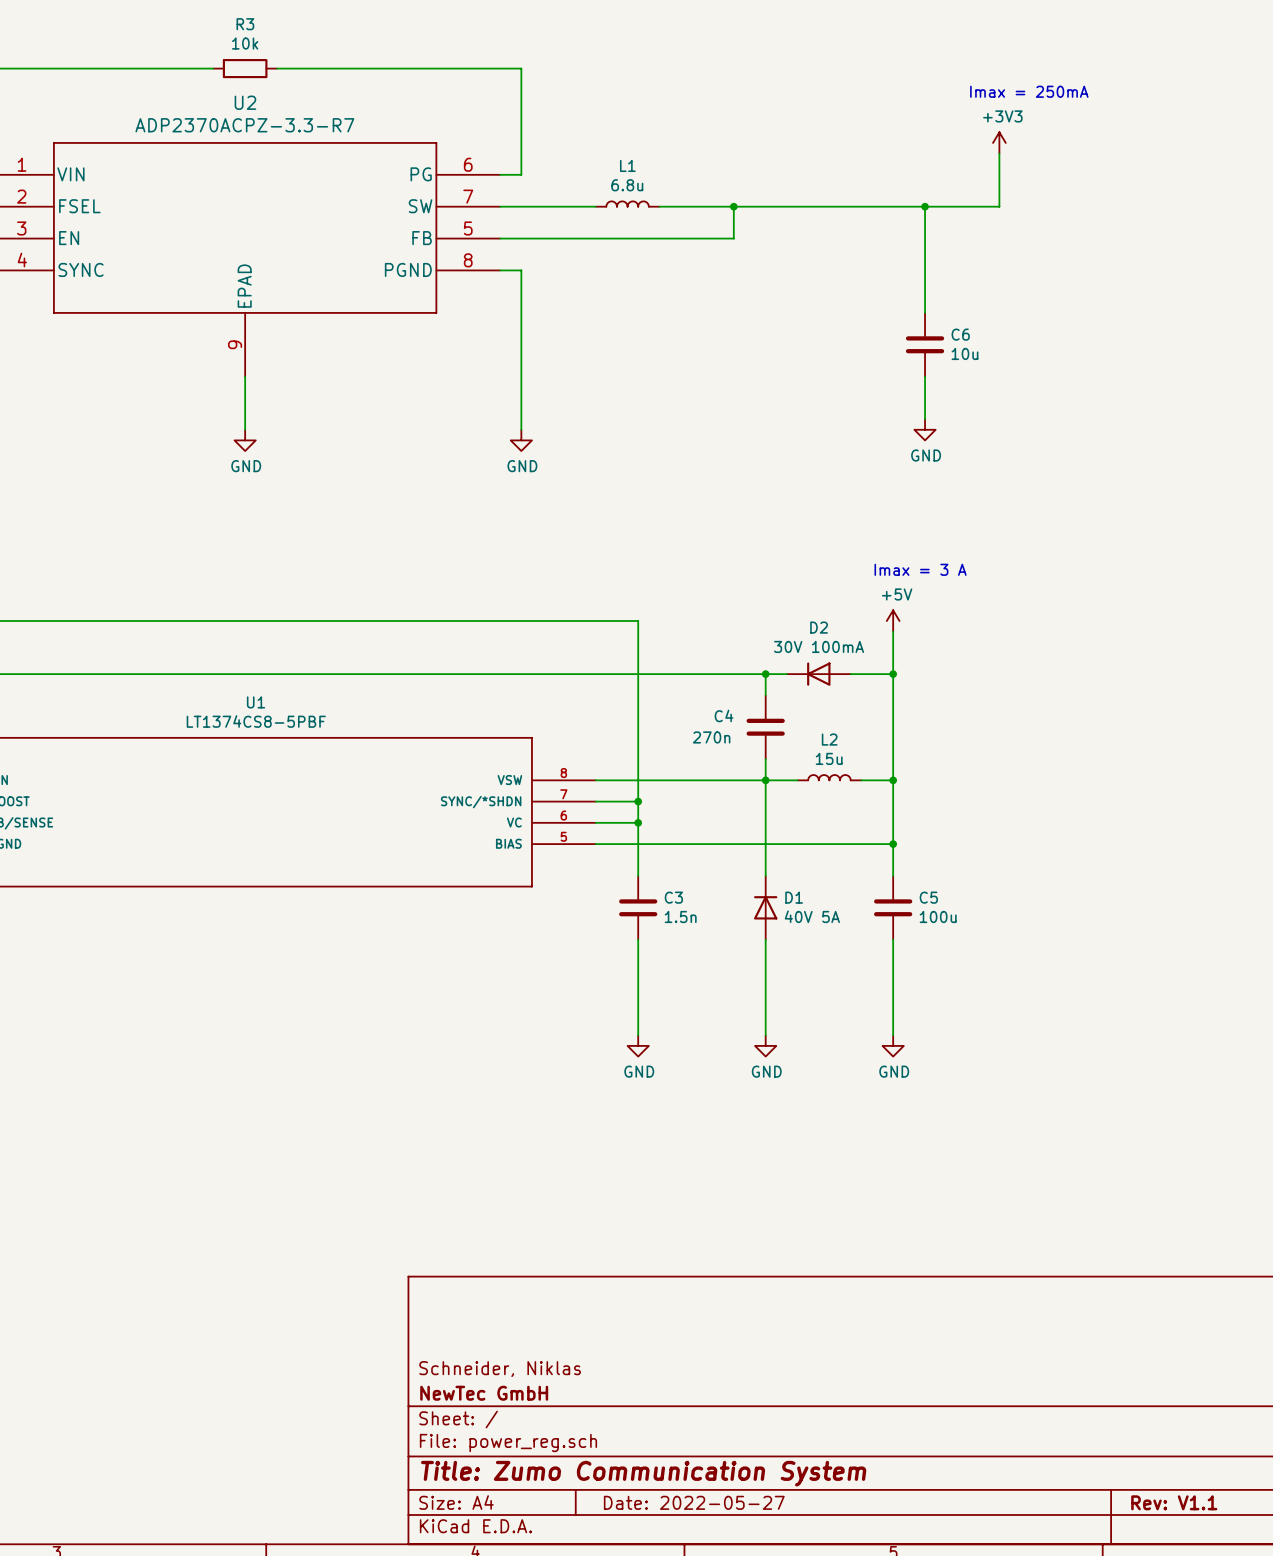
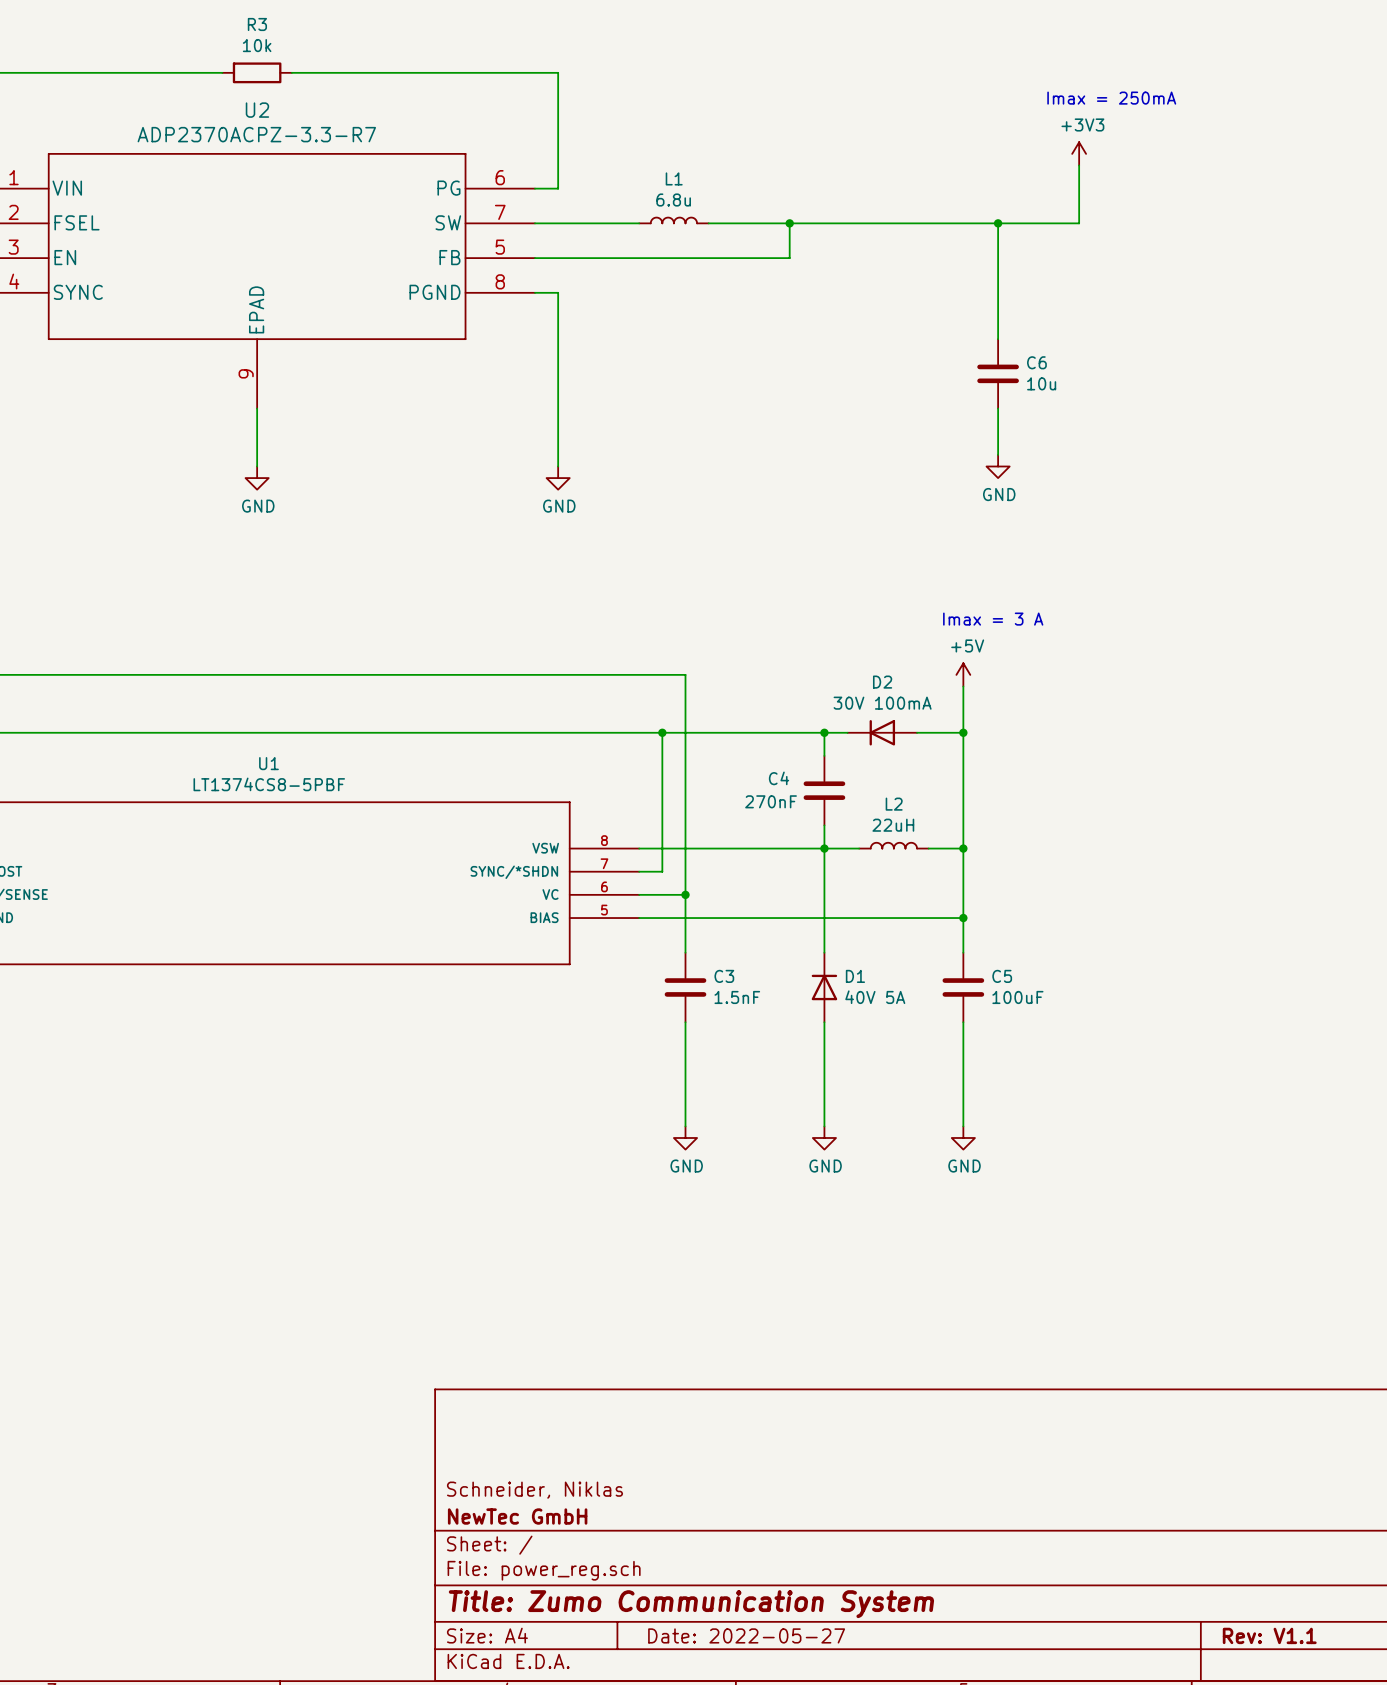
junction: none -> (662, 732)
C4 value: 270n (711, 737) -> 270nF (771, 801)
L2 value: 15u (829, 758) -> 22uH (893, 825)
wire: (616, 801) (638, 801) -> (662, 871) (662, 732)
junction: (638, 801) -> none
C3 value: 1.5n (680, 916) -> 1.5nF (737, 997)
C5 value: 100u (938, 916) -> 100uF (1017, 997)

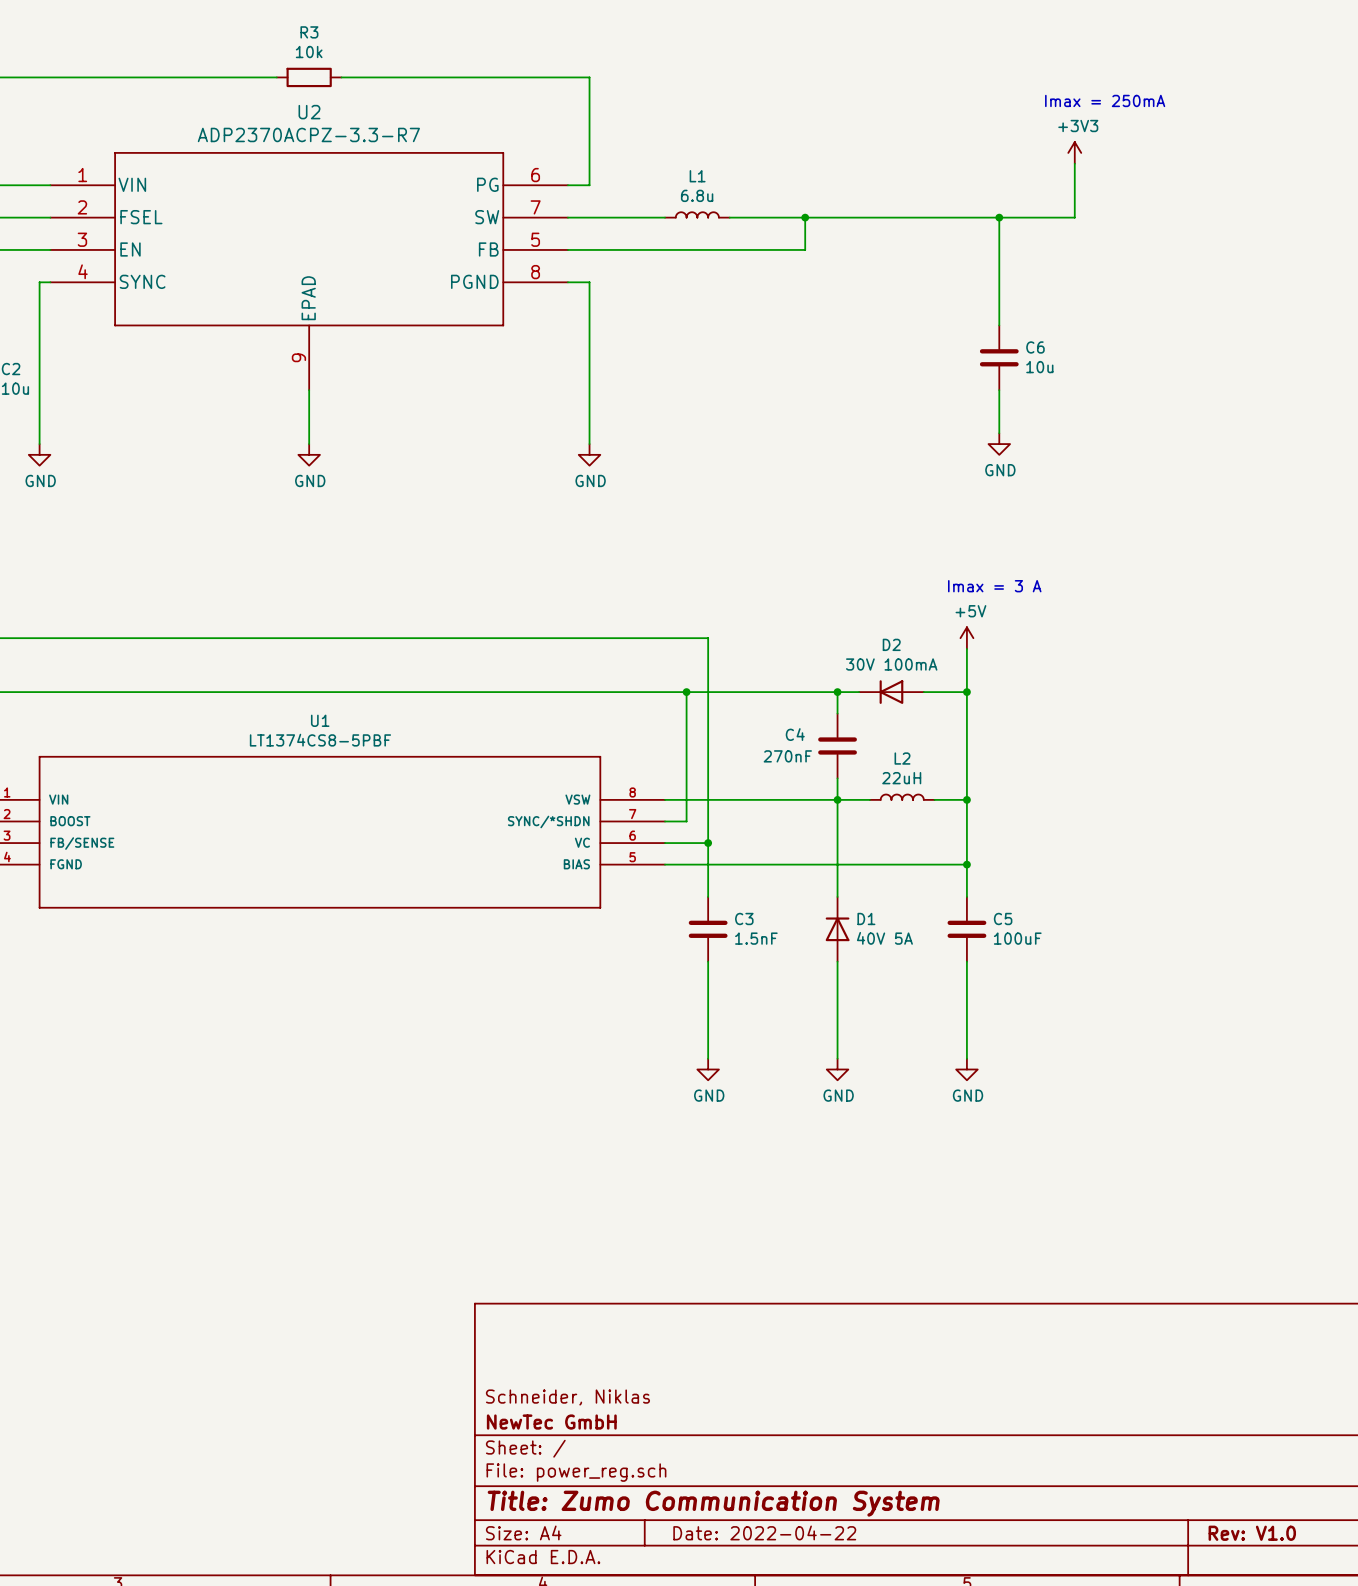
title block: Date: 2022-05-27 (746, 1635) -> Date: 2022-04-22 (764, 1532)
title block: Rev: V1.1 (1269, 1635) -> Rev: V1.0 (1252, 1533)

